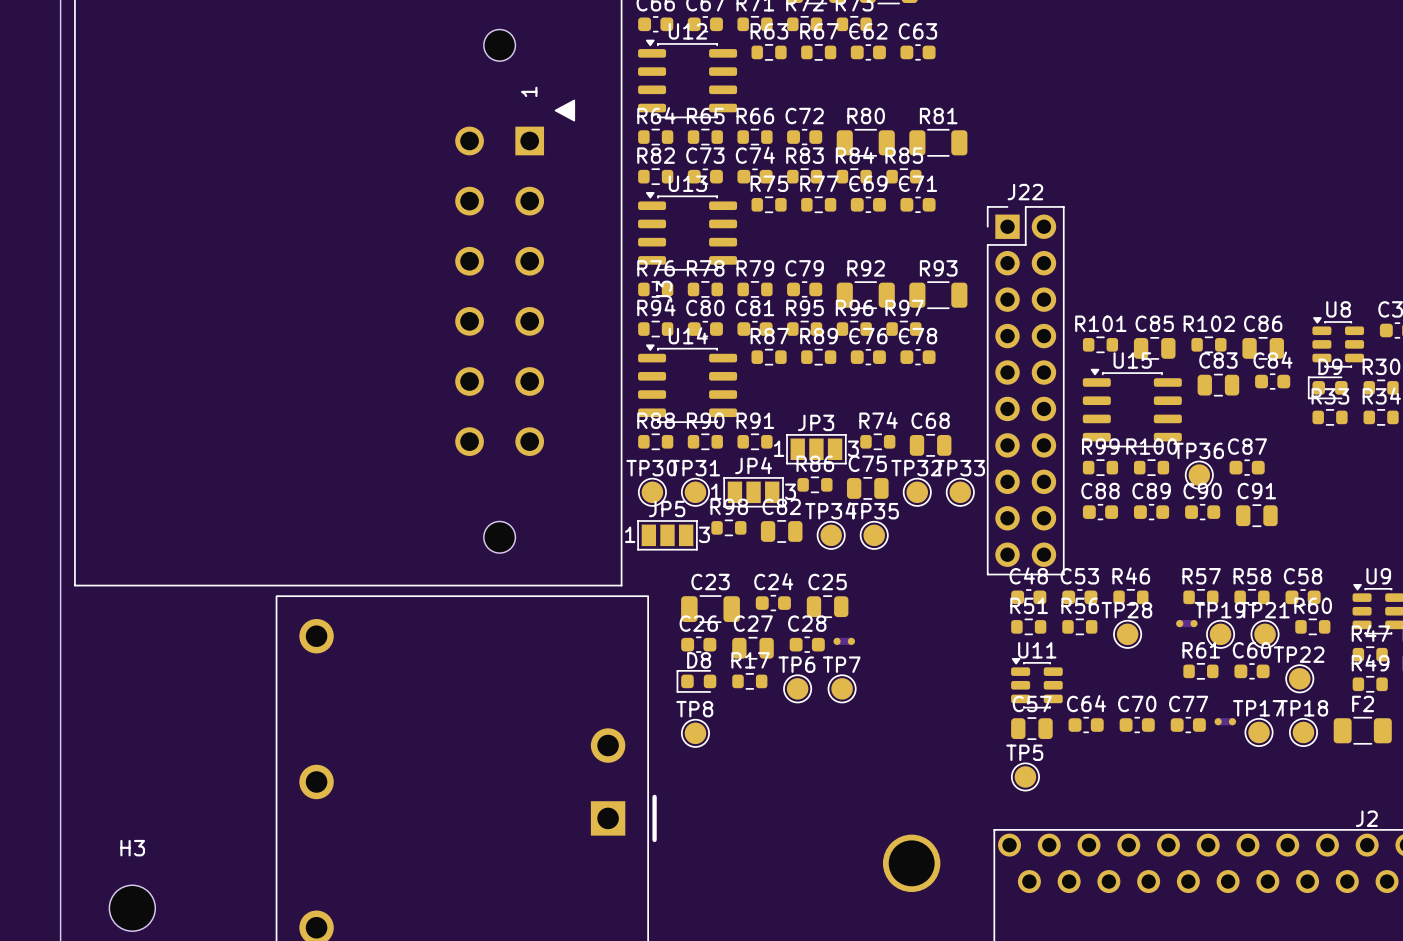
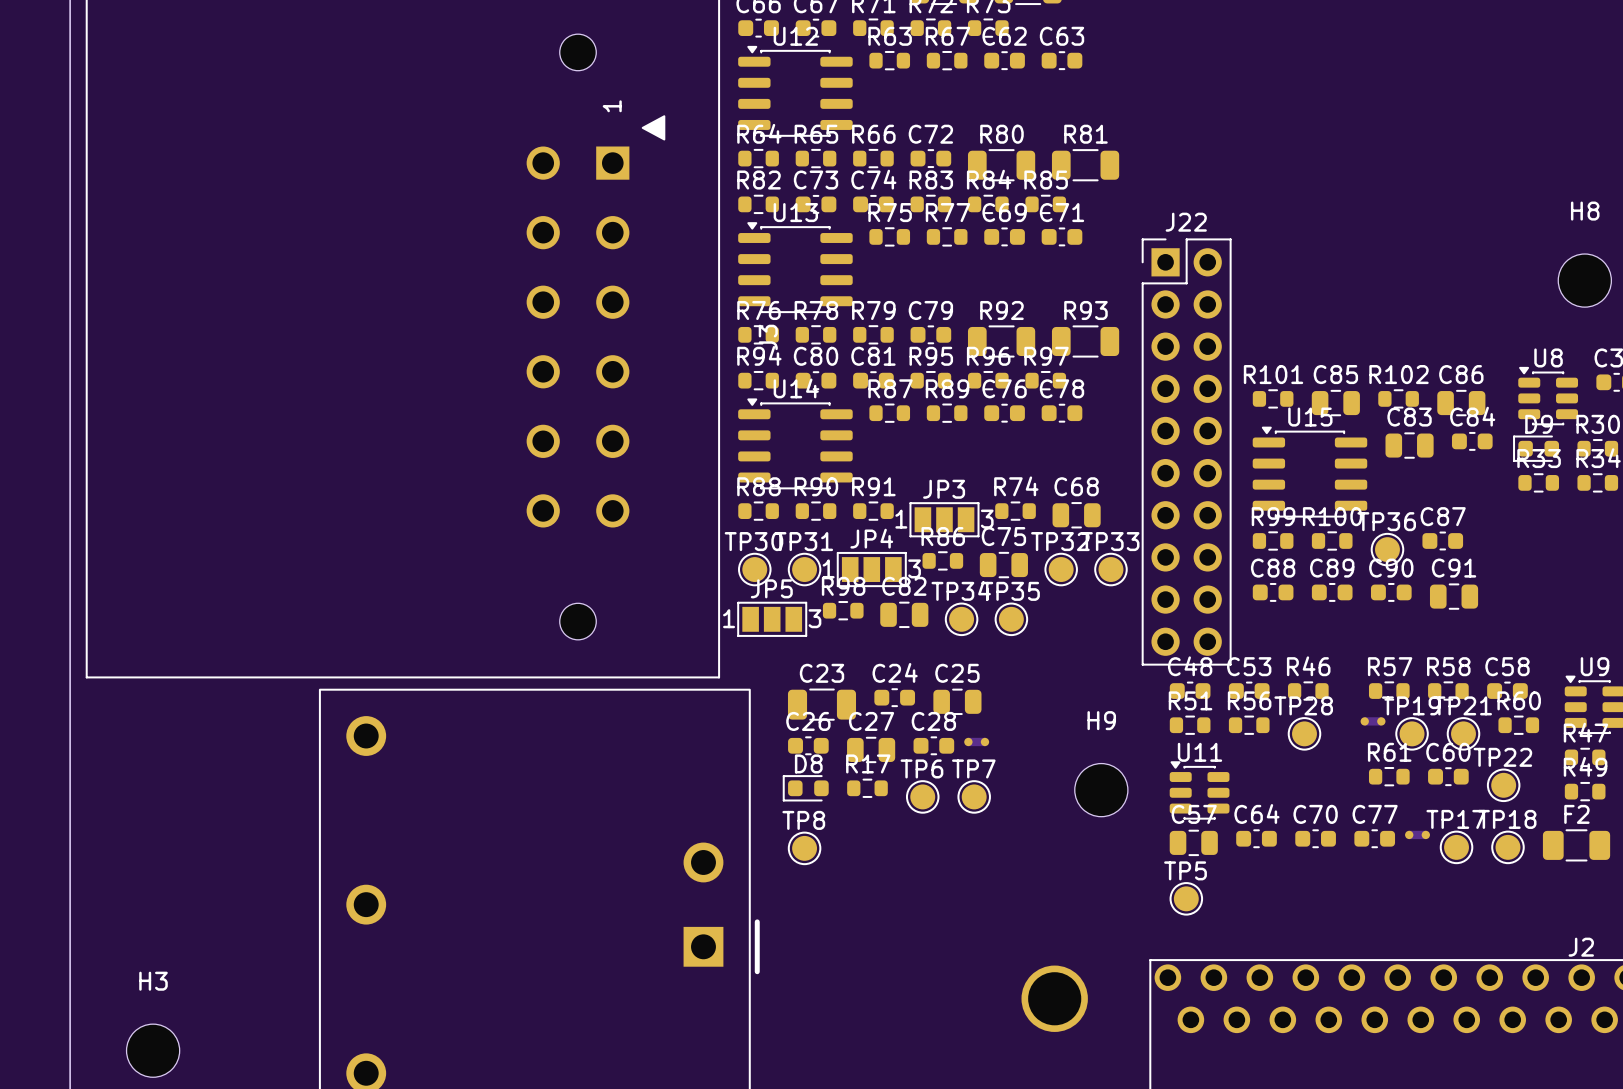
H8: none -> (1584, 280)
H9: none -> (1101, 790)

